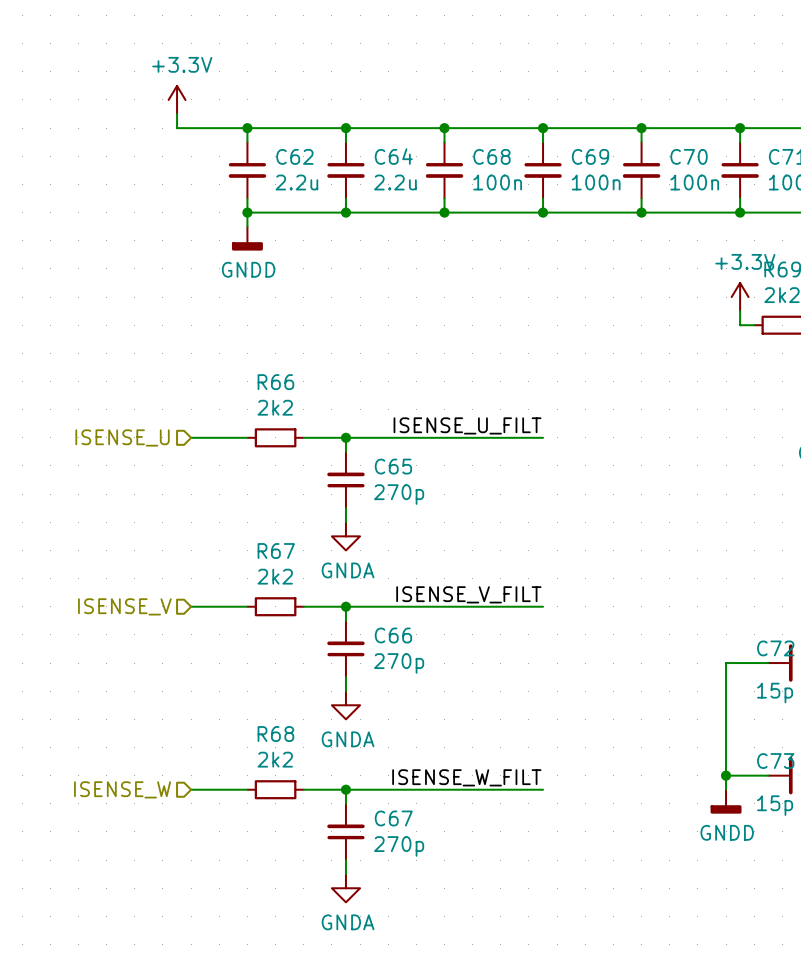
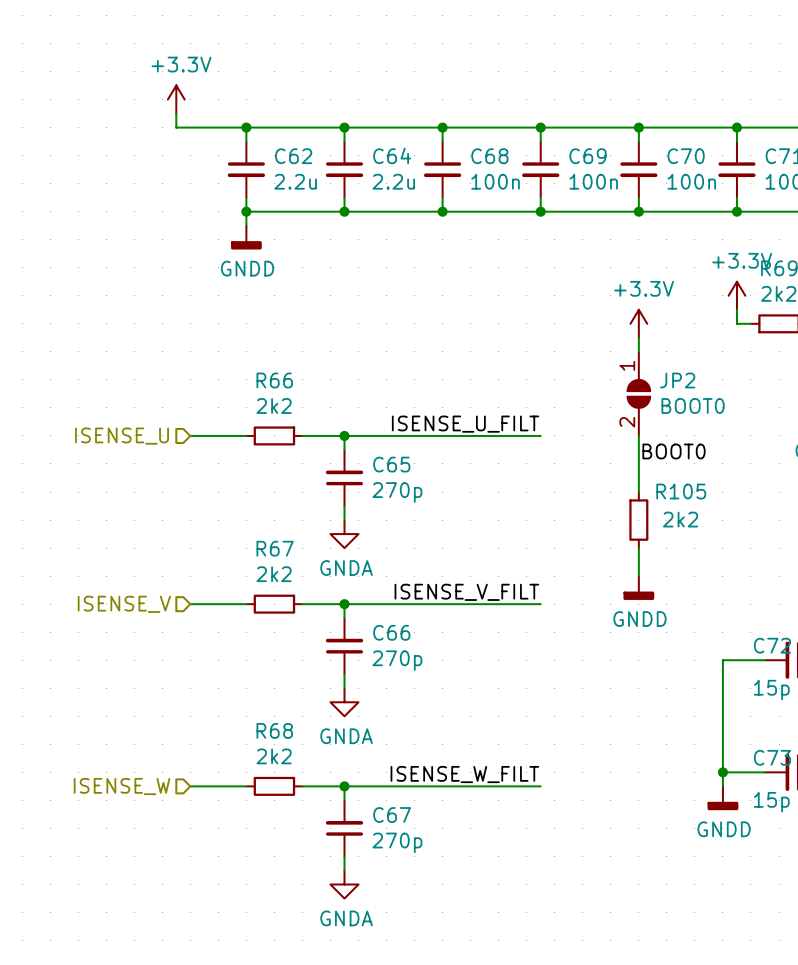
power symbol: none -> +3.3V (638, 323)
wire: none -> (638, 337) (638, 351)
JP2: none -> BOOT0 (638, 393)
wire: none -> (638, 435) (638, 492)
label: none -> BOOT0 (674, 451)
R105: none -> 2k2 (638, 520)
wire: none -> (638, 548) (638, 576)
power symbol: none -> GNDD (638, 588)

